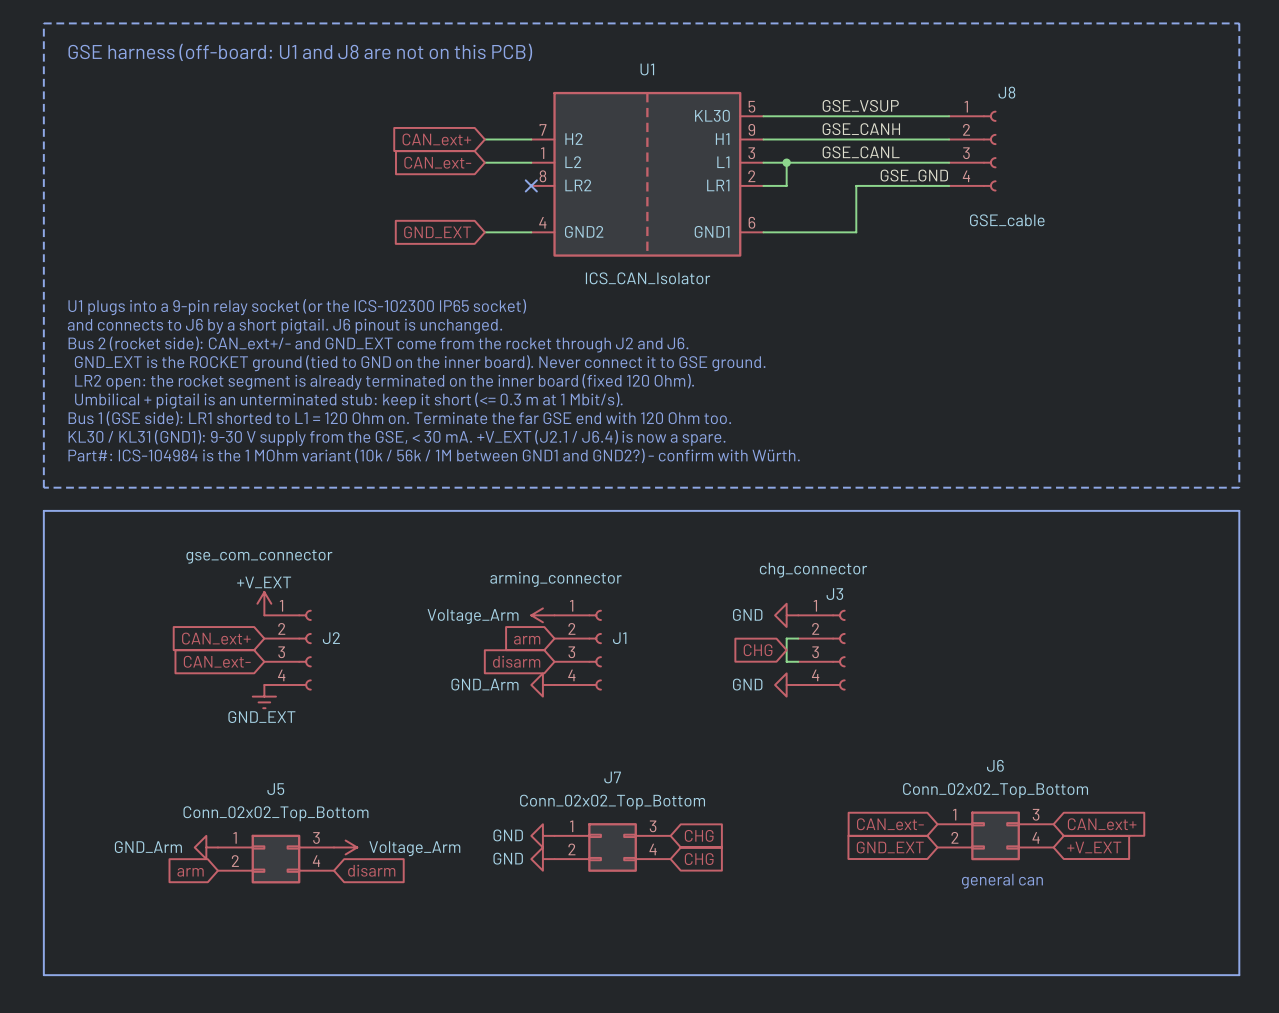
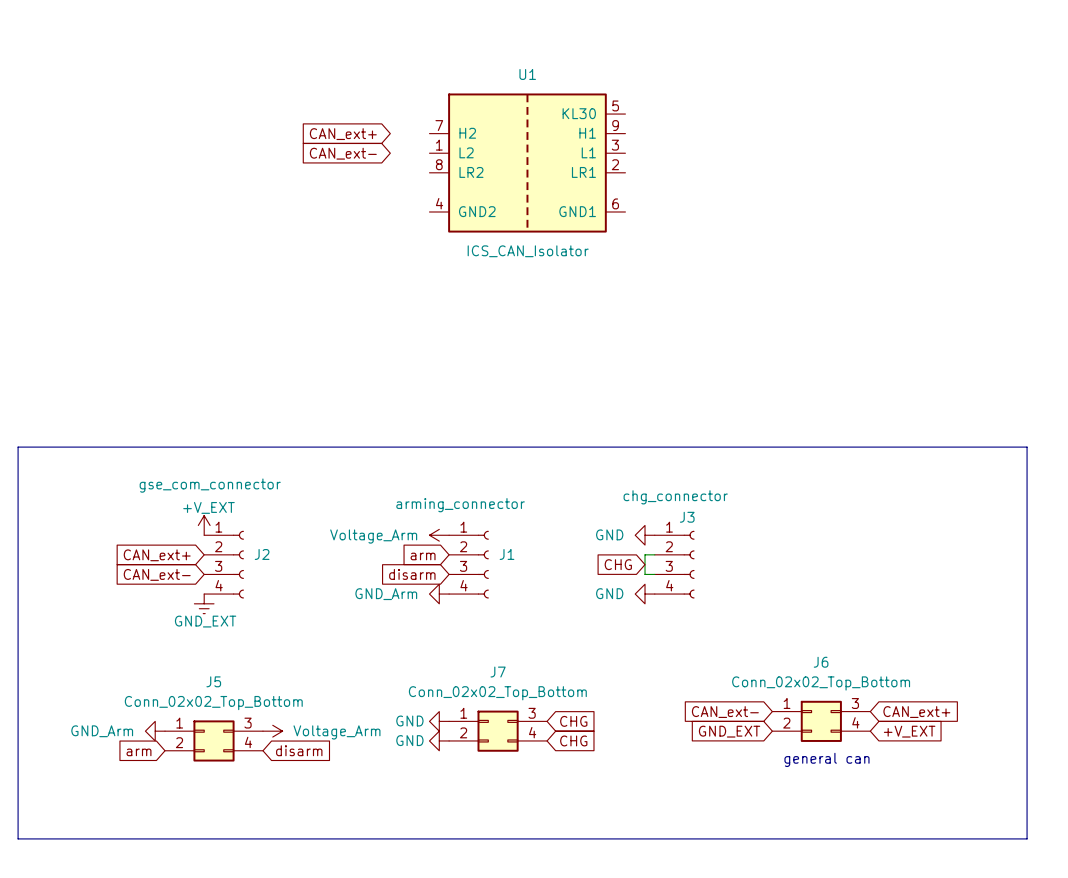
line: (43, 23) (1239, 23) (1239, 487) (43, 487) (43, 23) -> none
text: GSE harness (off-board: U1 and J8 are not on this PCB) (300, 52) -> none
label: GSE_VSUP (860, 105) -> none
wire: (763, 116) (949, 116) -> none
label: GSE_CANH (861, 129) -> none
wire: (484, 139) (531, 139) -> none
wire: (763, 139) (949, 139) -> none
J8: GSE_cable (972, 151) -> none
label: GSE_CANL (861, 152) -> none
wire: (484, 162) (531, 162) -> none
wire: (763, 162) (949, 162) -> none
wire: (786, 162) (786, 185) (763, 185) -> none
junction: (786, 162) -> none
label: GSE_GND (914, 175) -> none
no-connect mark: (531, 185) -> none
wire: (949, 185) (856, 185) (856, 232) (763, 232) -> none
global label: GND_EXT (437, 232) -> none
wire: (484, 232) (531, 232) -> none
text: U1 plugs into a 9-pin relay socket (or the ICS-102300 IP65 socket) (297, 307) -> none
text: and connects to J6 by a short pigtail. J6 pinout is unchanged. (284, 326) -> none
text: Bus 2 (rocket side): CAN_ext+/- and GND_EXT come from the rocket through J2 and J6. (378, 344) -> none
text: GND_EXT is the ROCKET ground (tied to GND on the inner board). Never connect it to GSE ground. (420, 363) -> none
text: LR2 open: the rocket segment is already terminated on the inner board (fixed 120 Ohm). (384, 381) -> none
text: Umbilical + pigtail is an unterminated stub: keep it short (<= 0.3 m at 1 Mbit/s). (348, 400) -> none
text: Bus 1 (GSE side): LR1 shorted to L1 = 120 Ohm on. Terminate the far GSE end with 120 Ohm too. (399, 418) -> none
text: KL30 / KL31 (GND1): 9-30 V supply from the GSE, < 30 mA. +V_EXT (J2.1 / J6.4) is now a spare. (397, 437) -> none
text: Part#: ICS-104984 is the 1 MOhm variant (10k / 56k / 1M between GND1 and GND2?) - confirm with Würth. (434, 455) -> none

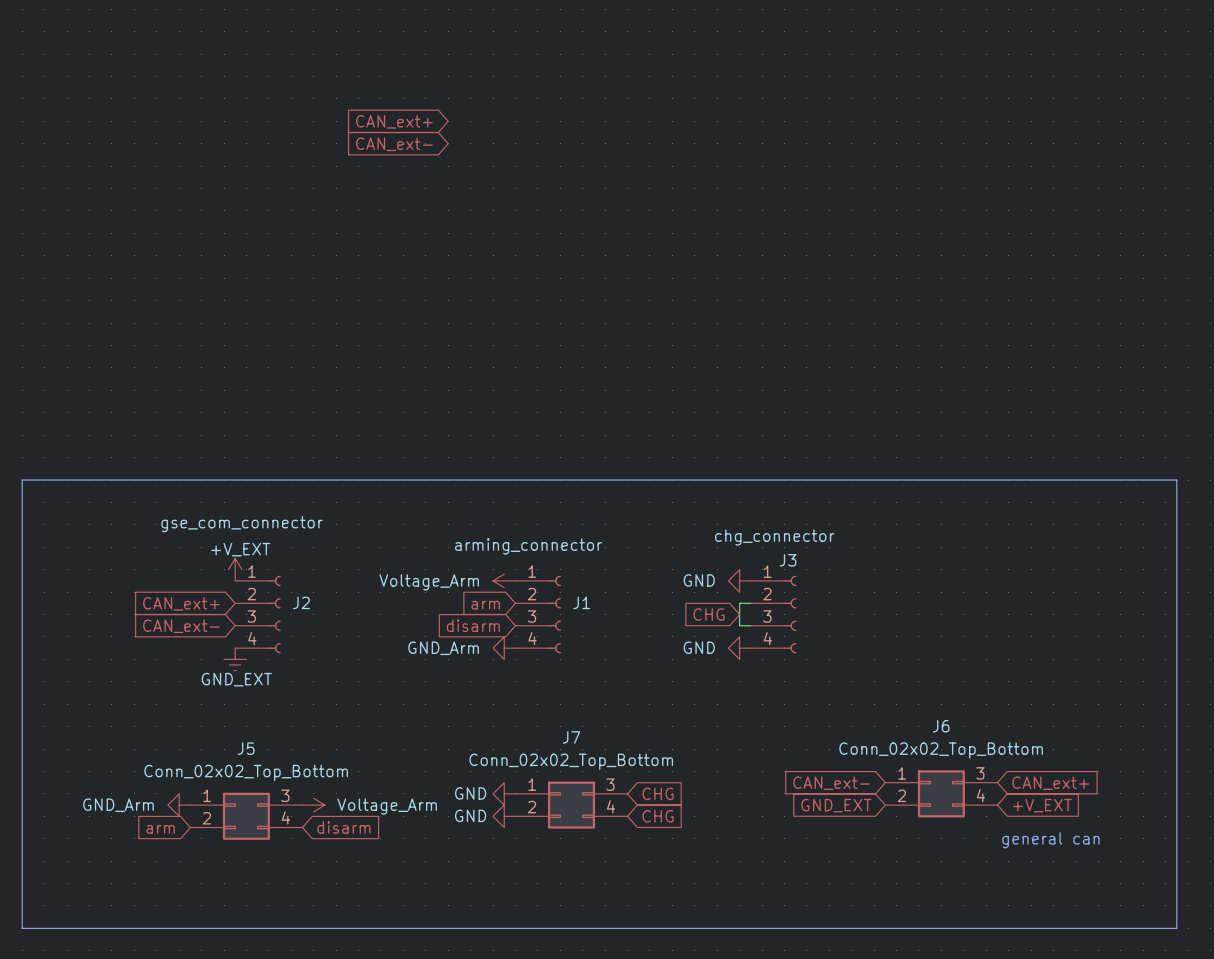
U1: ICS_CAN_Isolator (527, 163) -> none
text position: general can (826, 759) -> general can (1050, 840)

